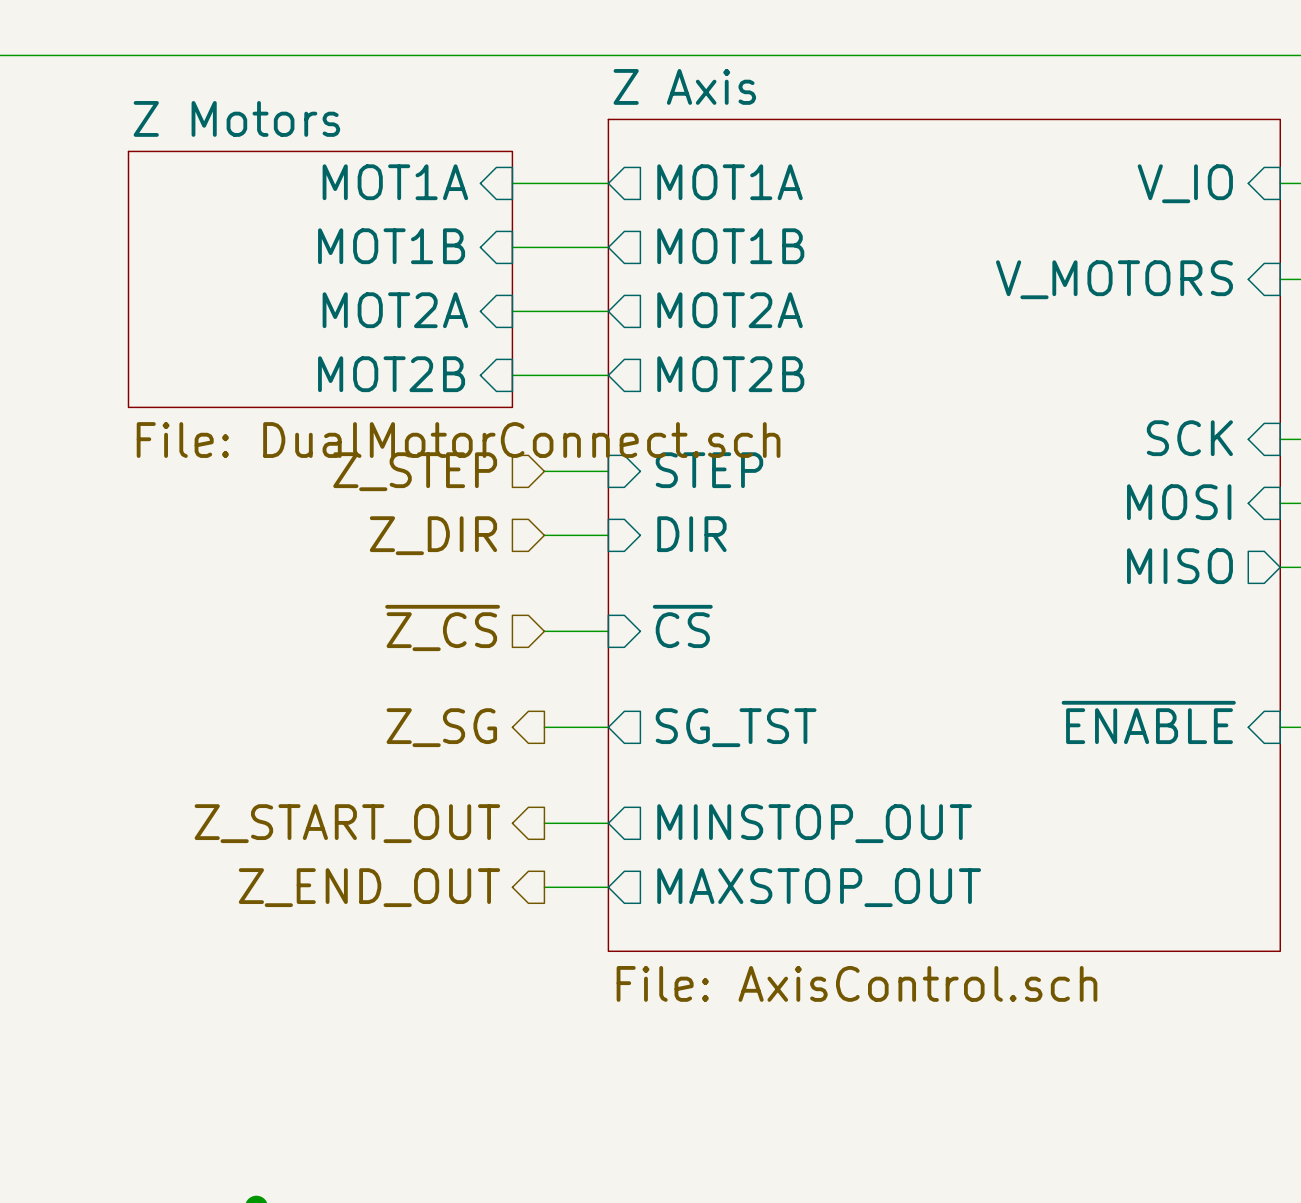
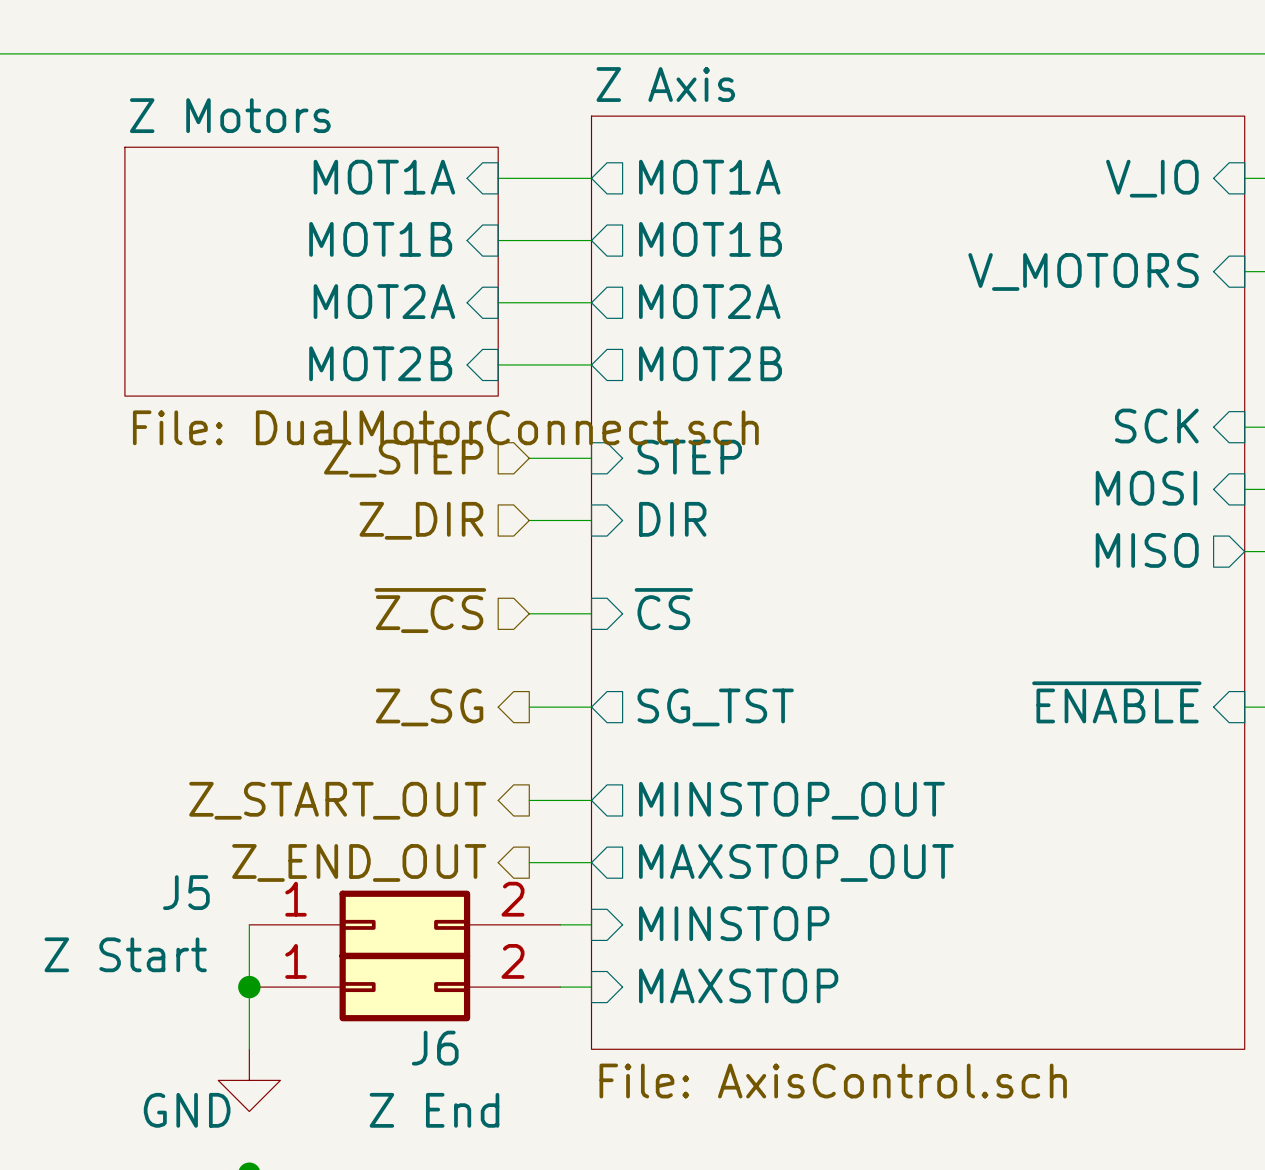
sheet Z Axis: File: AxisControl.sch (944, 535) -> none
sheet Z Axis: none -> File: AxisControl.sch (918, 582)
sheet pin: none -> MINSTOP (734, 923)
wire: none -> (249, 924) (249, 1049)
J5: none -> Z Start (404, 924)
wire: none -> (560, 924) (591, 924)
sheet pin: none -> MAXSTOP (738, 985)
junction: none -> (249, 987)
J6: none -> Z End (404, 987)
wire: none -> (560, 987) (591, 987)
power symbol: none -> GND (249, 1080)

